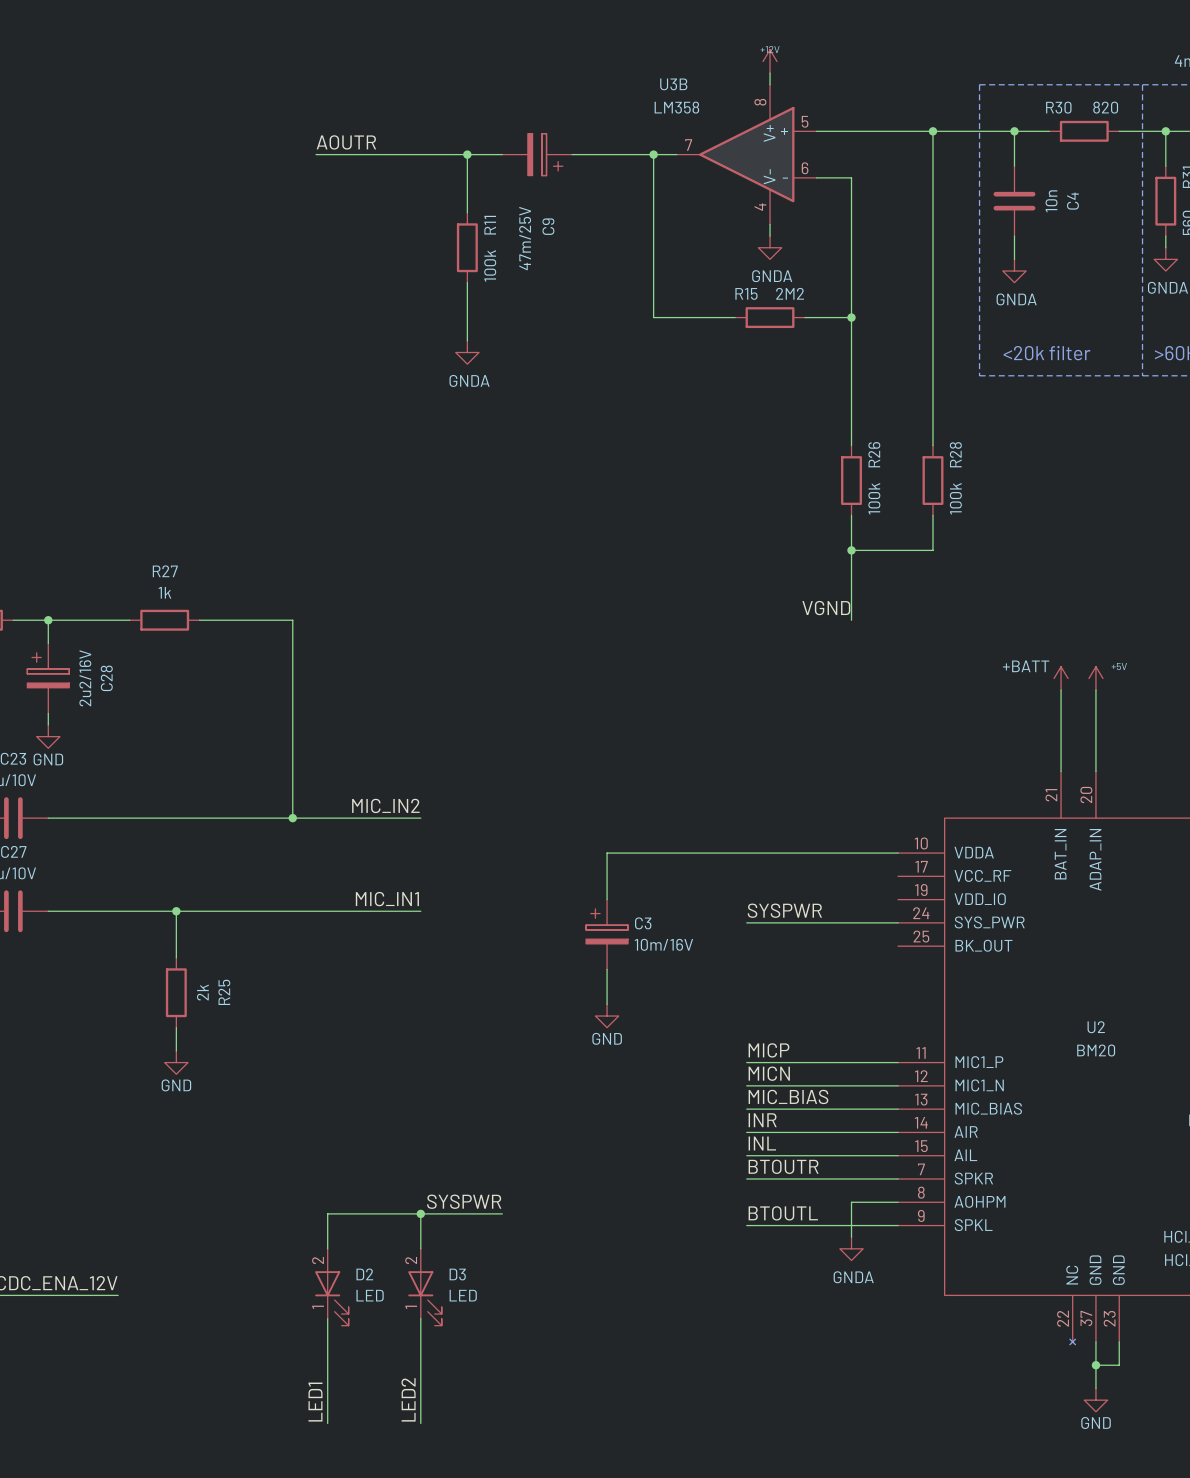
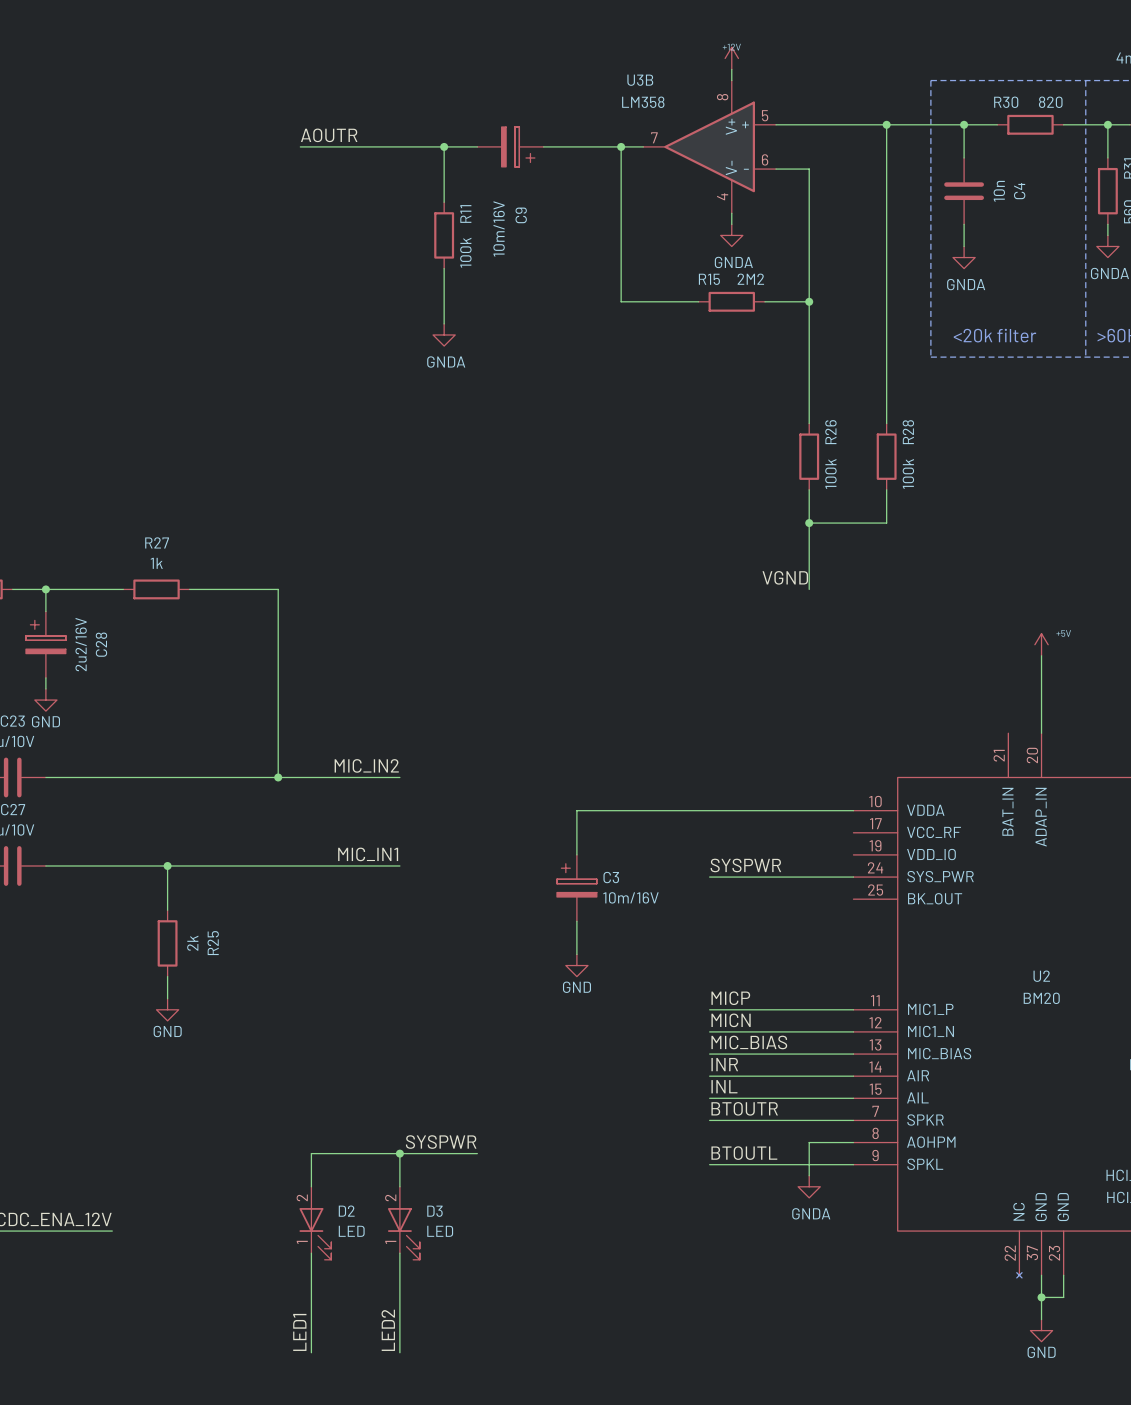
C9 value: 47m/25V (525, 238) -> 10m/16V (499, 228)
power symbol: +BATT (1061, 678) -> none
wire: (1061, 690) (1061, 771) -> none

